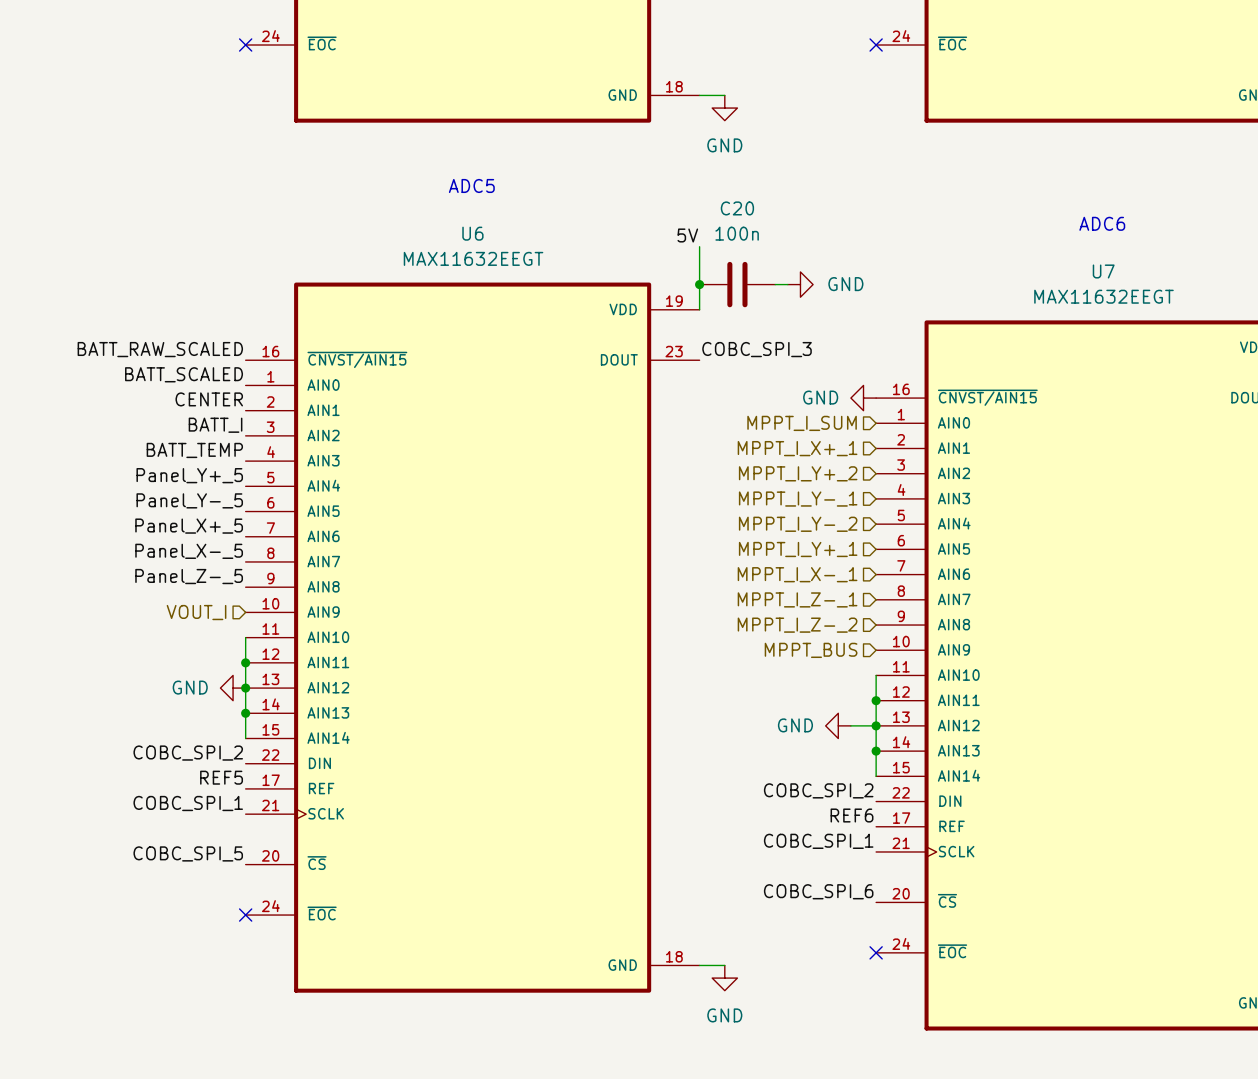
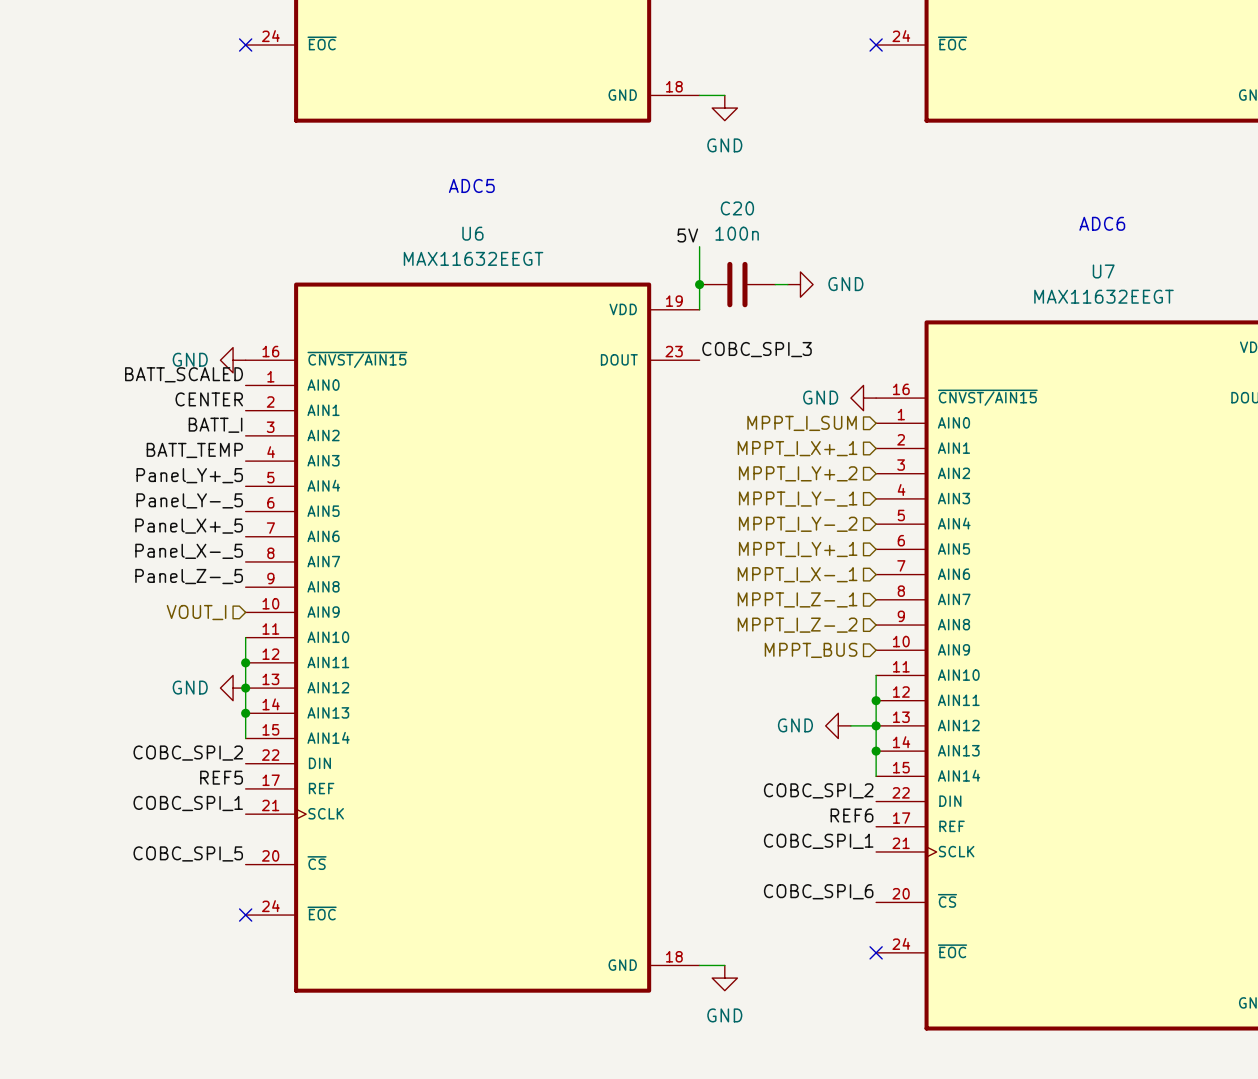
label: BATT_RAW_SCALED (160, 349) -> none
power symbol: none -> GND (233, 360)

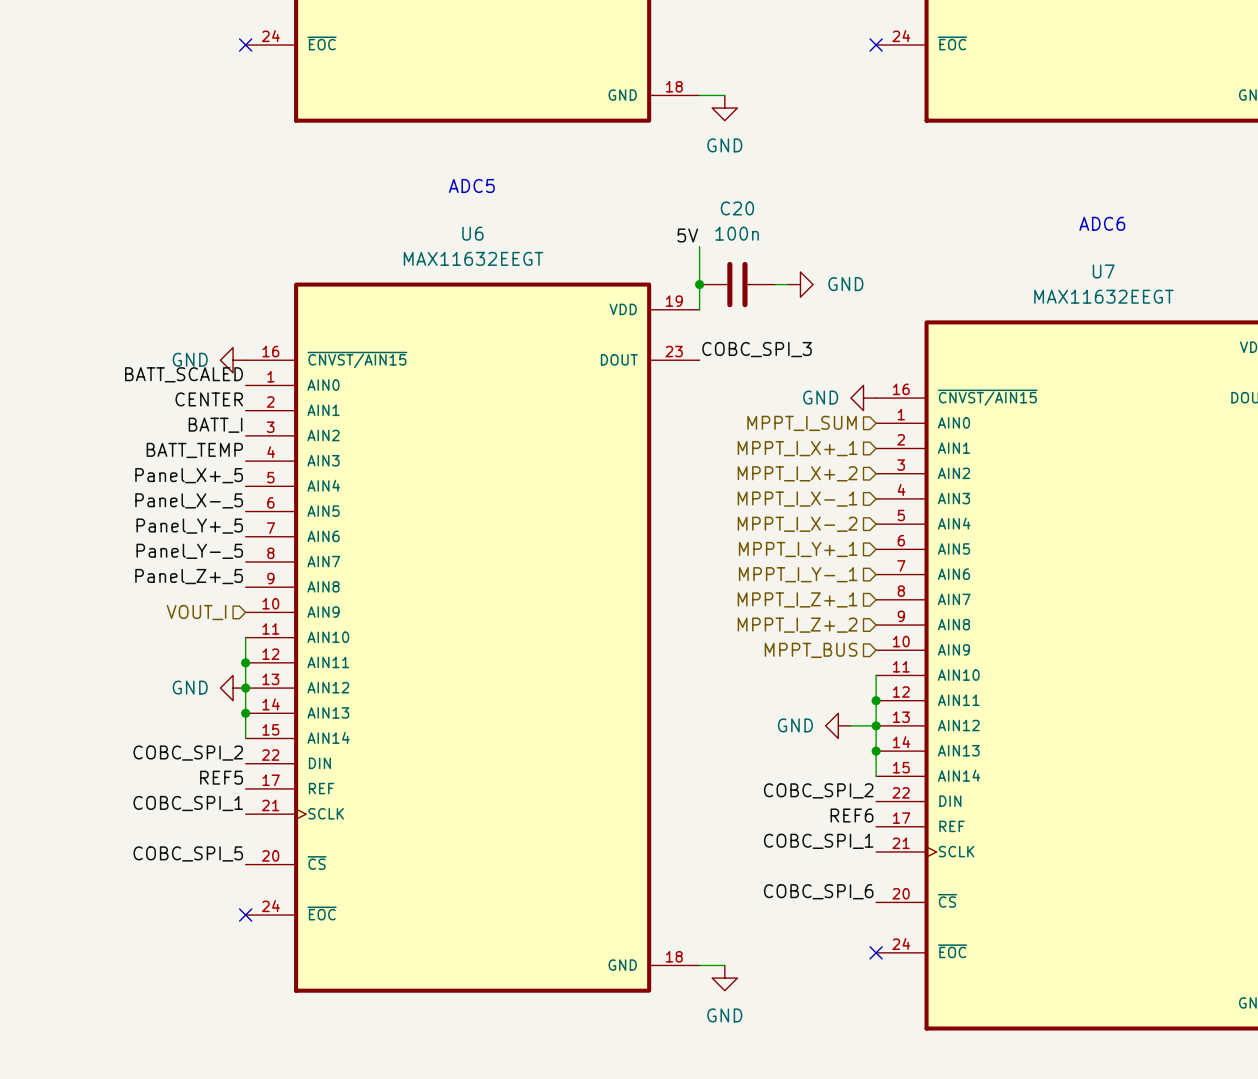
hierarchical label: MPPT_I_Y+_2 (798, 473) -> MPPT_I_X+_2 (797, 473)
label: Panel_Y+_5 (189, 475) -> Panel_X+_5 (189, 475)
hierarchical label: MPPT_I_Y-_1 (798, 499) -> MPPT_I_X-_1 (797, 499)
label: Panel_Y-_5 (189, 500) -> Panel_X-_5 (189, 500)
hierarchical label: MPPT_I_Y-_2 (798, 524) -> MPPT_I_X-_2 (797, 524)
label: Panel_X+_5 (189, 526) -> Panel_Y+_5 (189, 526)
label: Panel_X-_5 (189, 551) -> Panel_Y-_5 (189, 551)
hierarchical label: MPPT_I_X-_1 (797, 574) -> MPPT_I_Y-_1 (798, 574)
label: Panel_Z-_5 (189, 576) -> Panel_Z+_5 (189, 576)
hierarchical label: MPPT_I_Z-_1 (797, 599) -> MPPT_I_Z+_1 (797, 599)
hierarchical label: MPPT_I_Z-_2 (797, 625) -> MPPT_I_Z+_2 (797, 625)

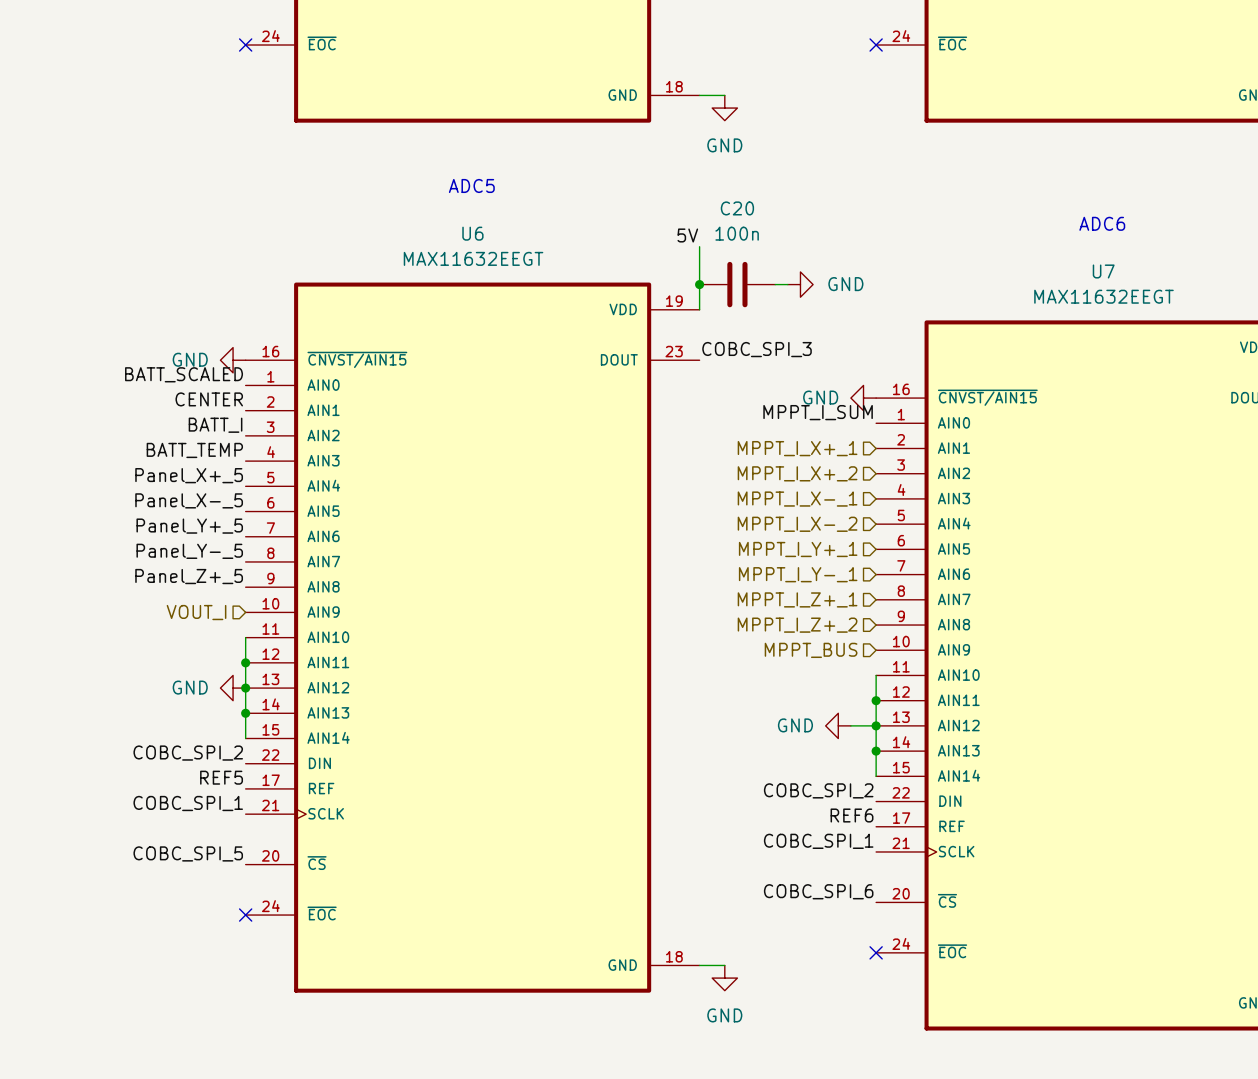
label: none -> MPPT_I_SUM (818, 412)
hierarchical label: MPPT_I_SUM (802, 423) -> none

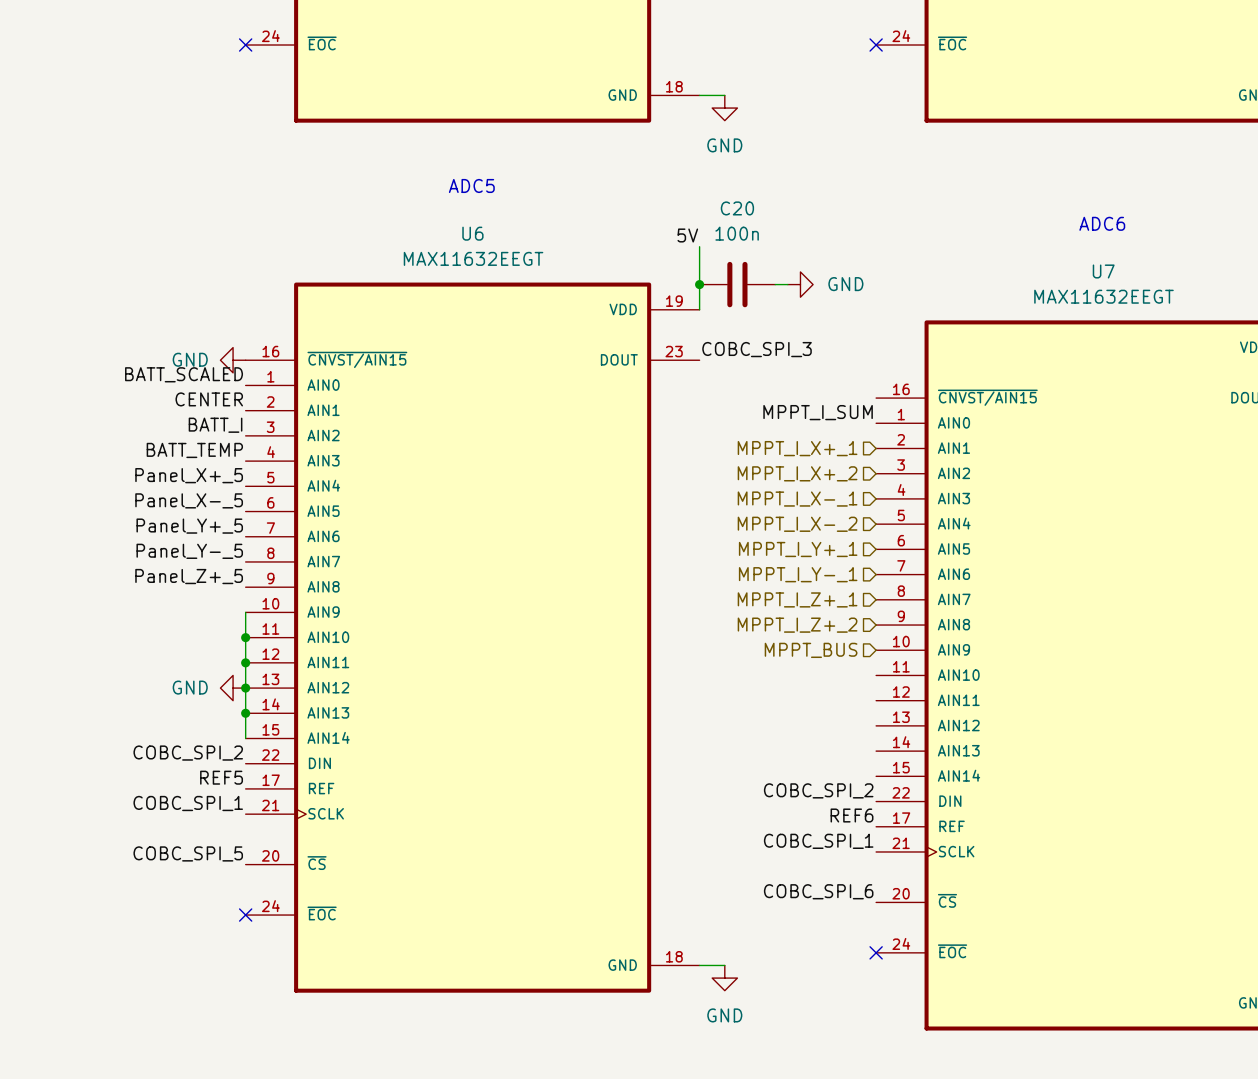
power symbol: GND (863, 398) -> none
hierarchical label: VOUT_I (196, 612) -> none
wire: none -> (245, 612) (245, 637)
junction: none -> (245, 637)
wire: (876, 675) (876, 776) -> none
junction: (876, 700) -> none
power symbol: GND (838, 725) -> none
wire: (850, 725) (876, 725) -> none
junction: (876, 725) -> none
junction: (876, 751) -> none

